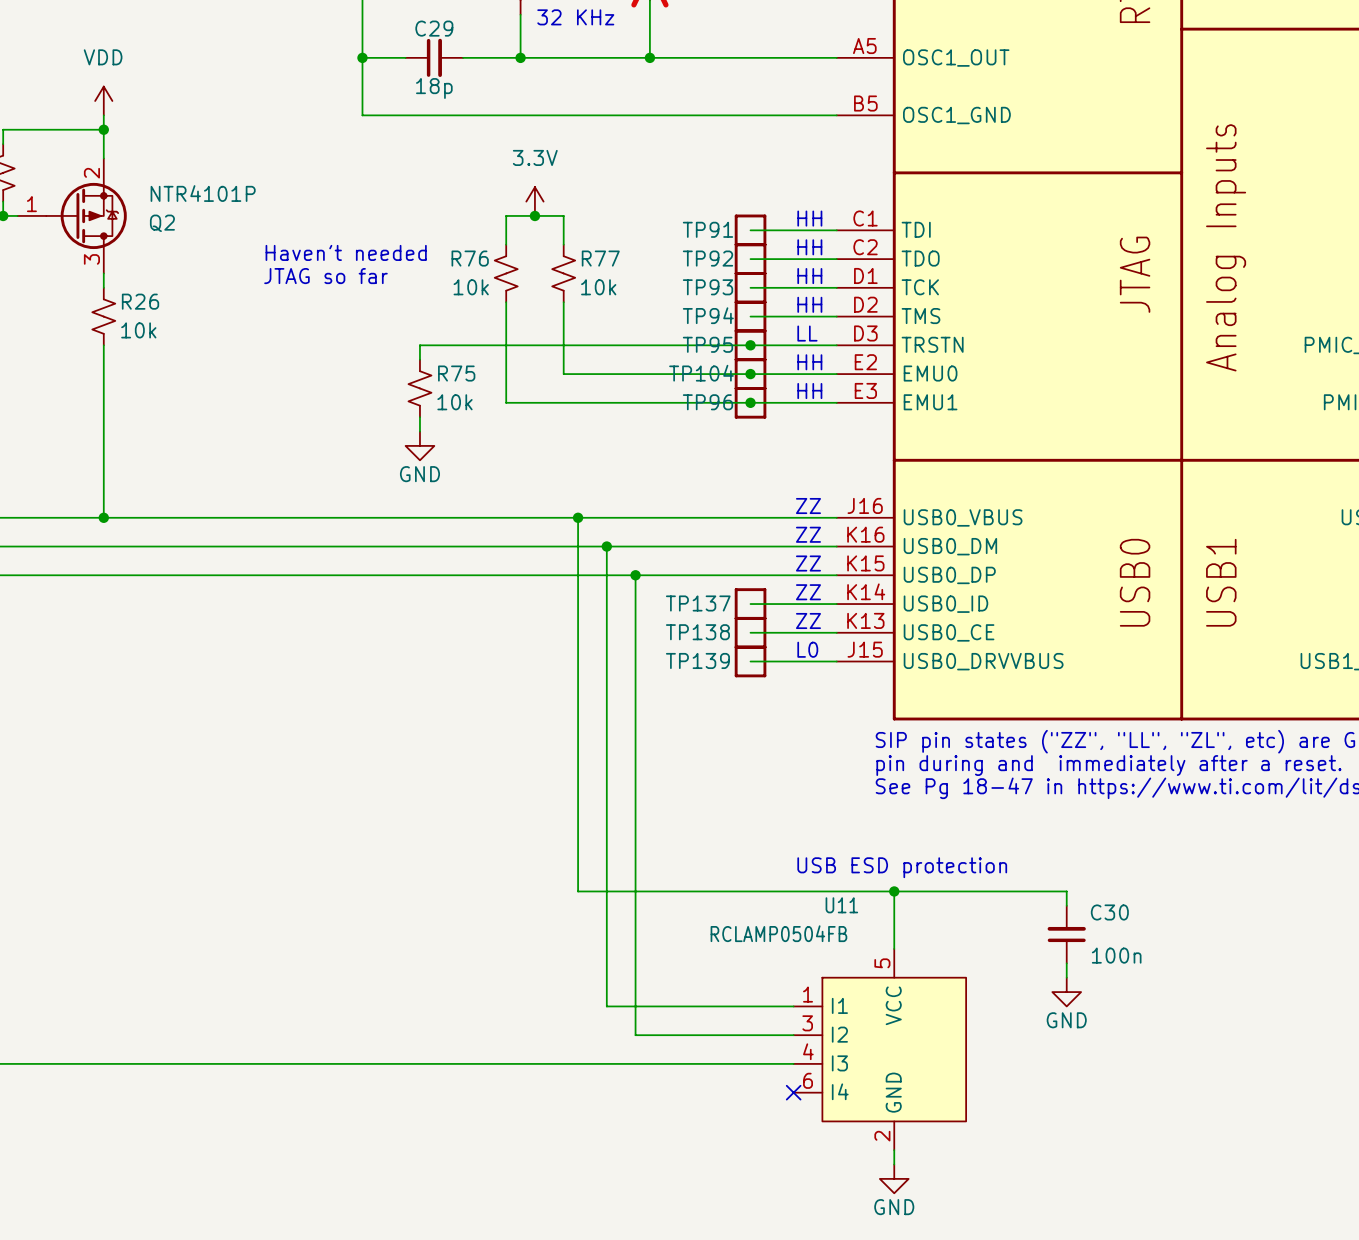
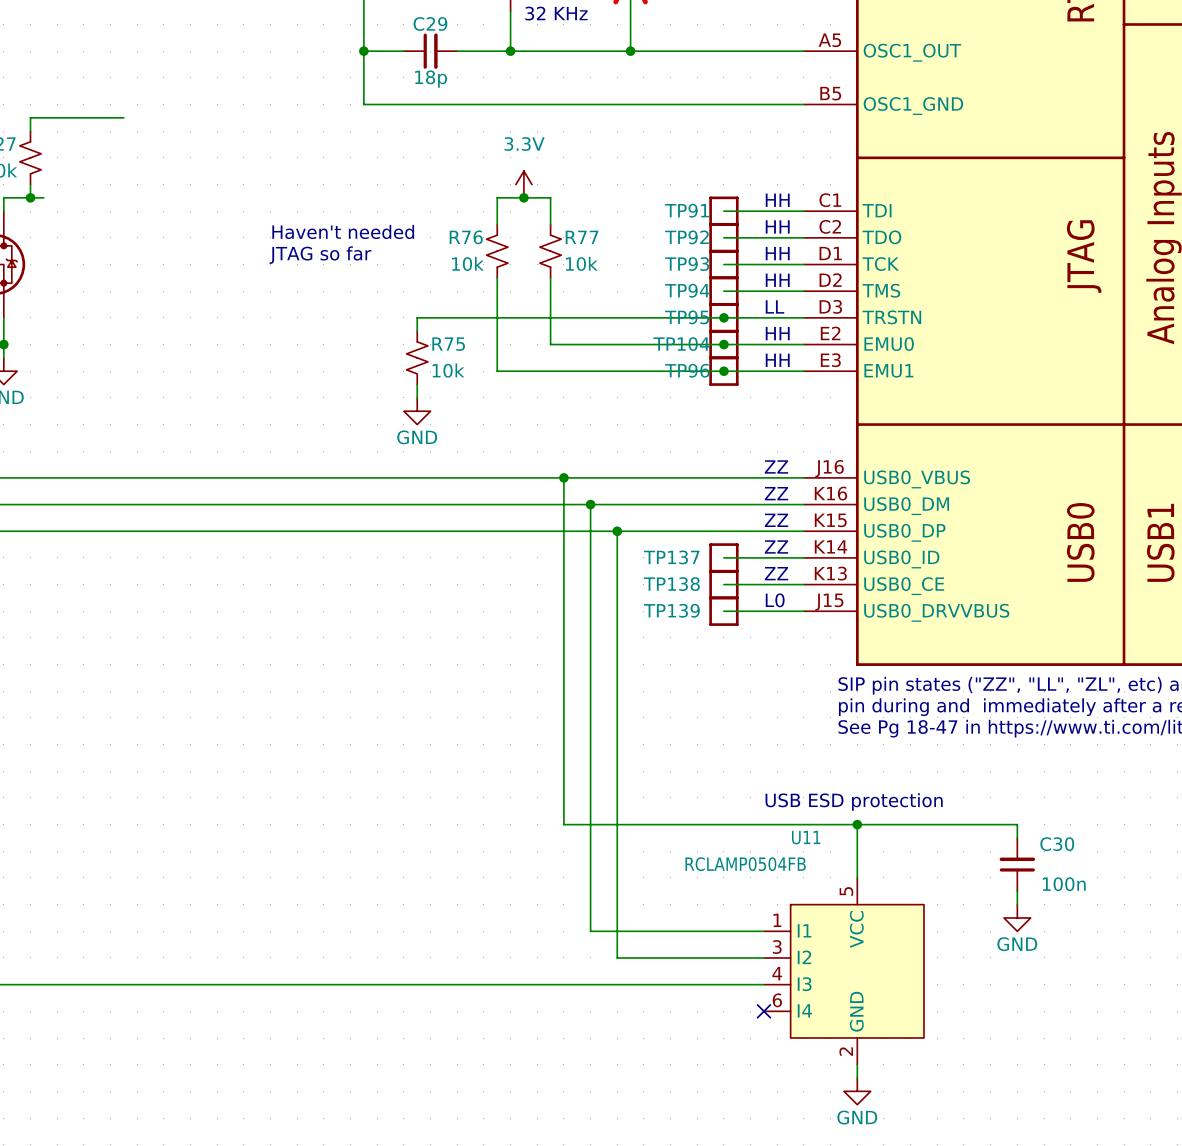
power symbol: VDD (103, 100) -> none
wire: (103, 115) (103, 158) -> none
junction: (103, 129) -> none
Q2: NTR4101P (72, 215) -> none
wire: (103, 273) (103, 287) -> none
R26: 10k (103, 316) -> none
wire: (103, 345) (103, 517) -> none
junction: (103, 517) -> none

